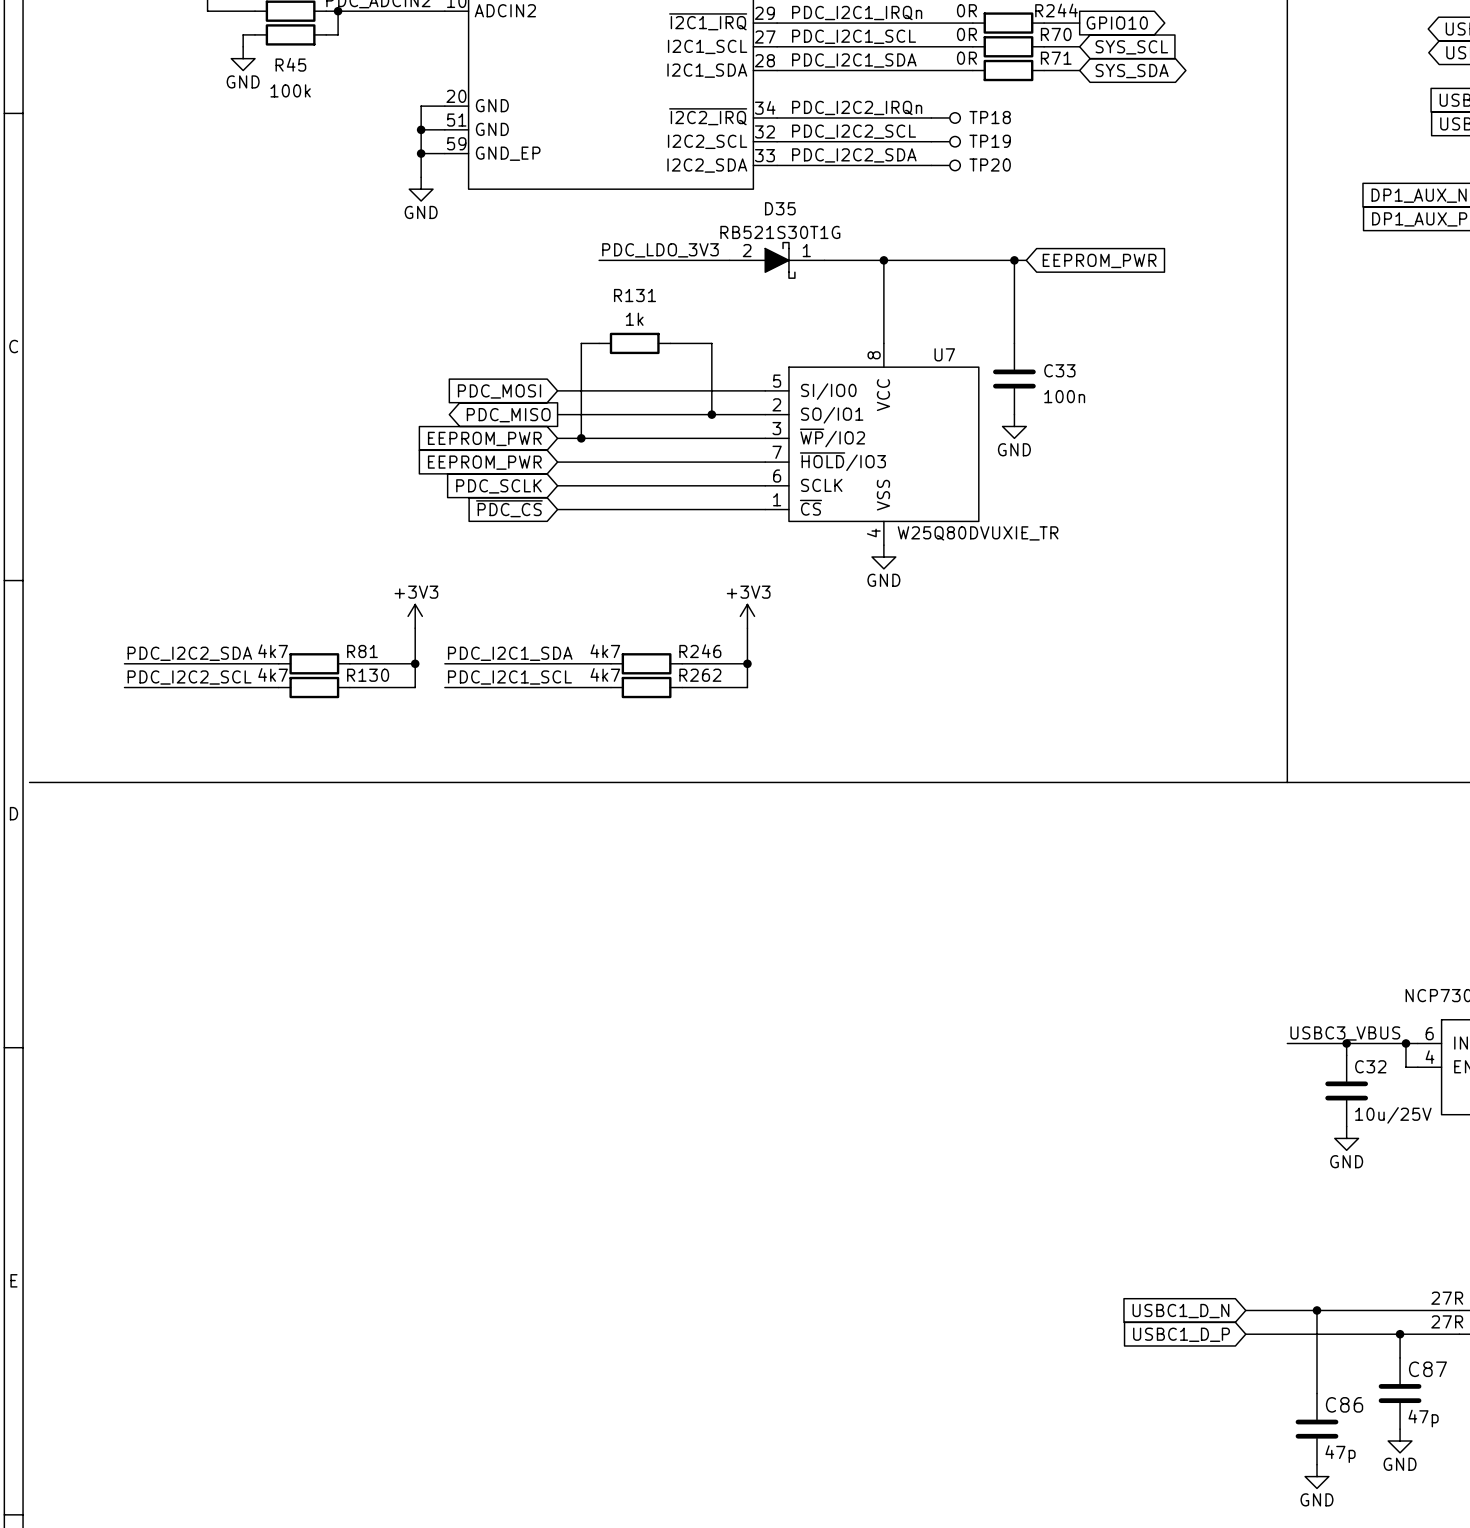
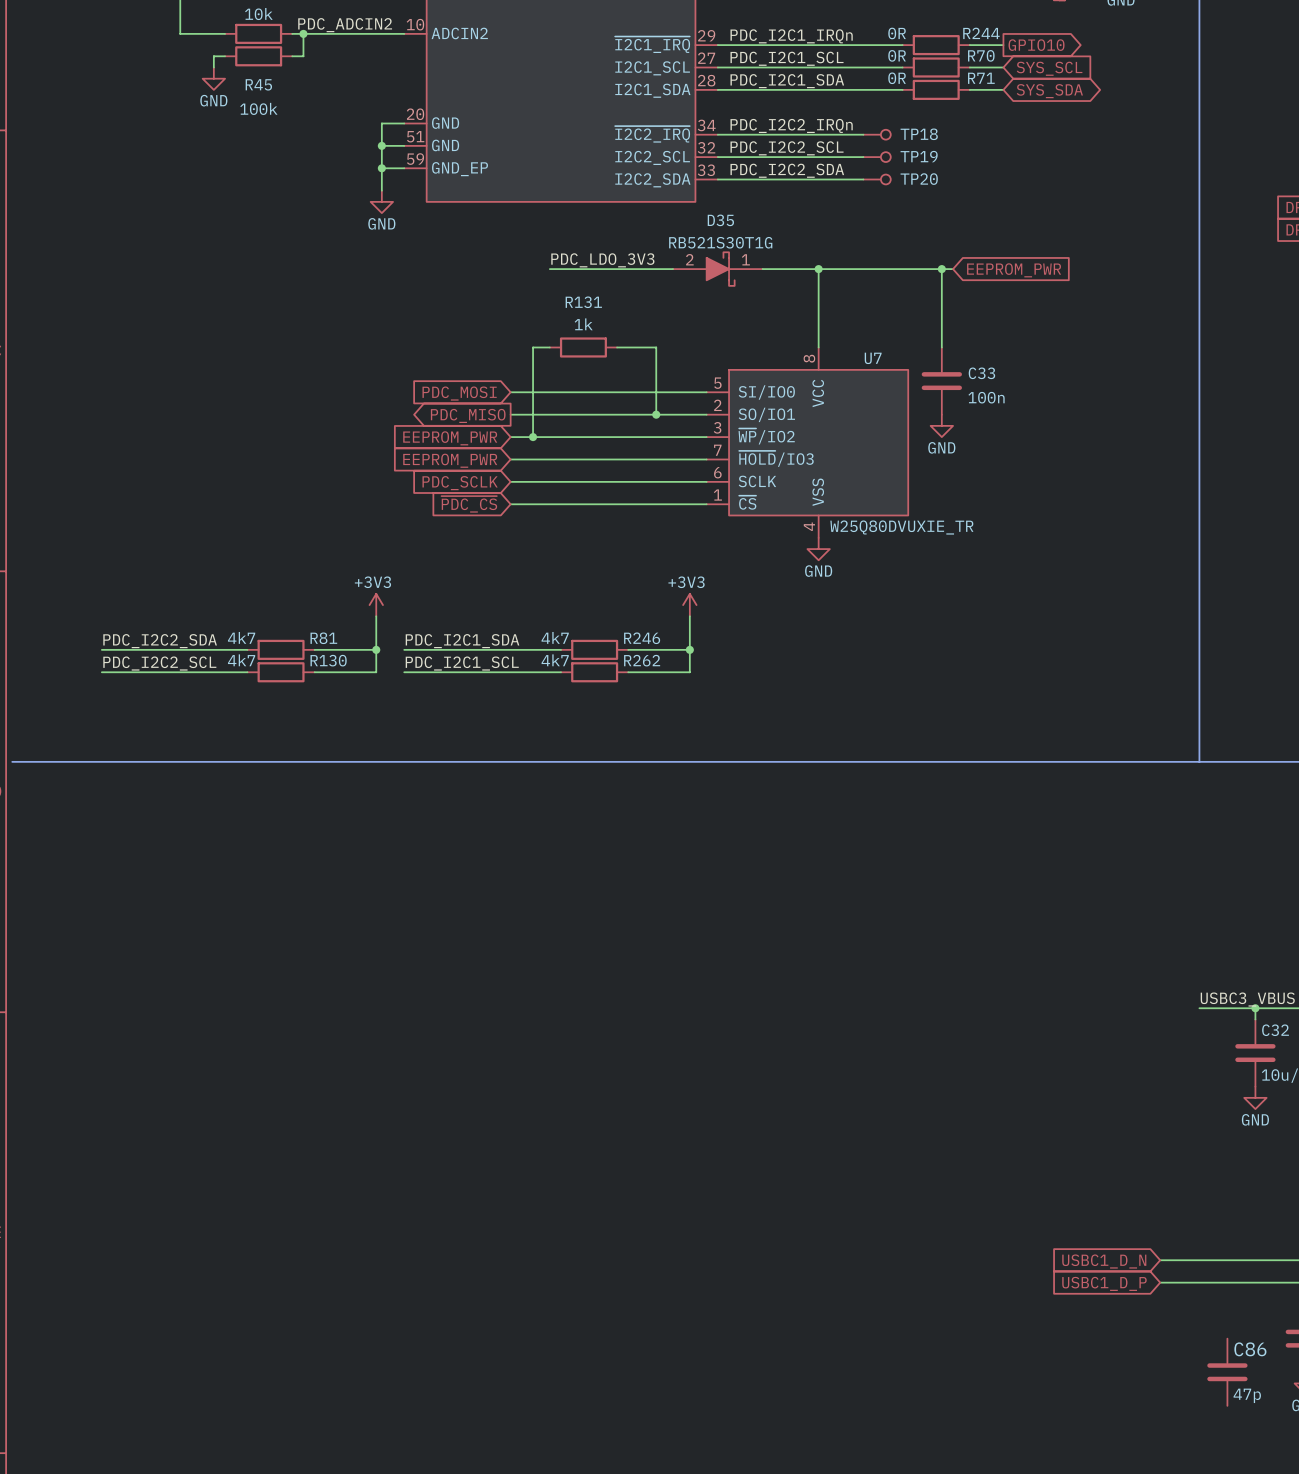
wire: (1316, 1310) (1316, 1393) -> none
junction: (1316, 1310) -> none
power symbol: GND (1316, 1476) -> none

